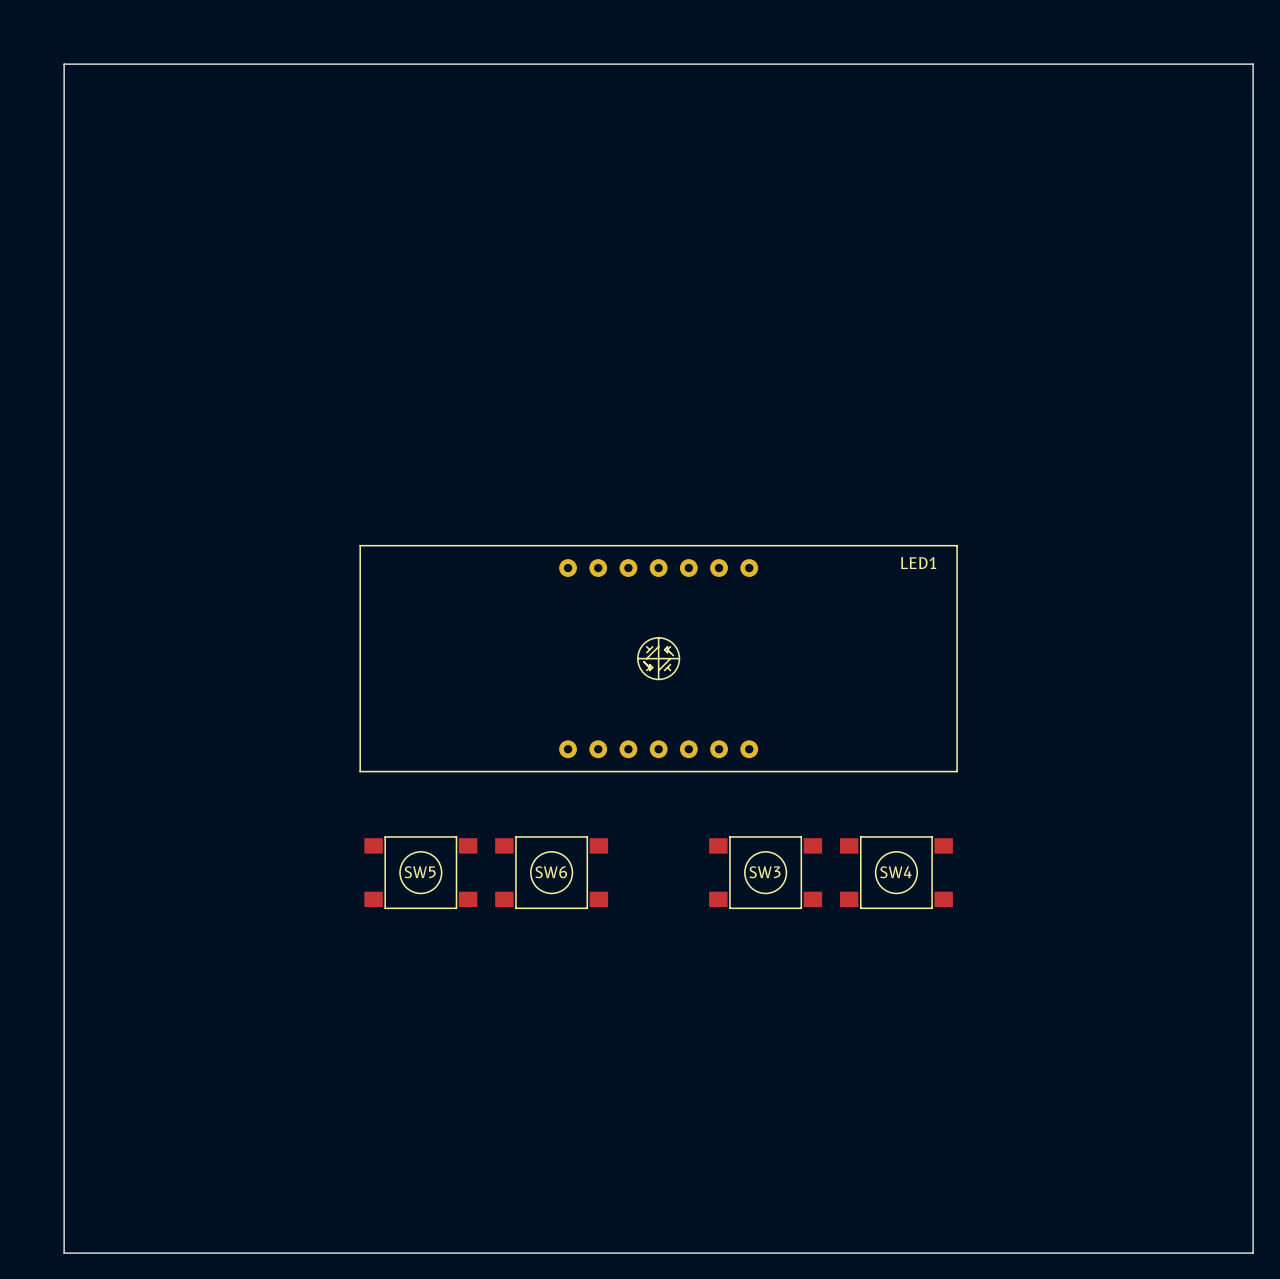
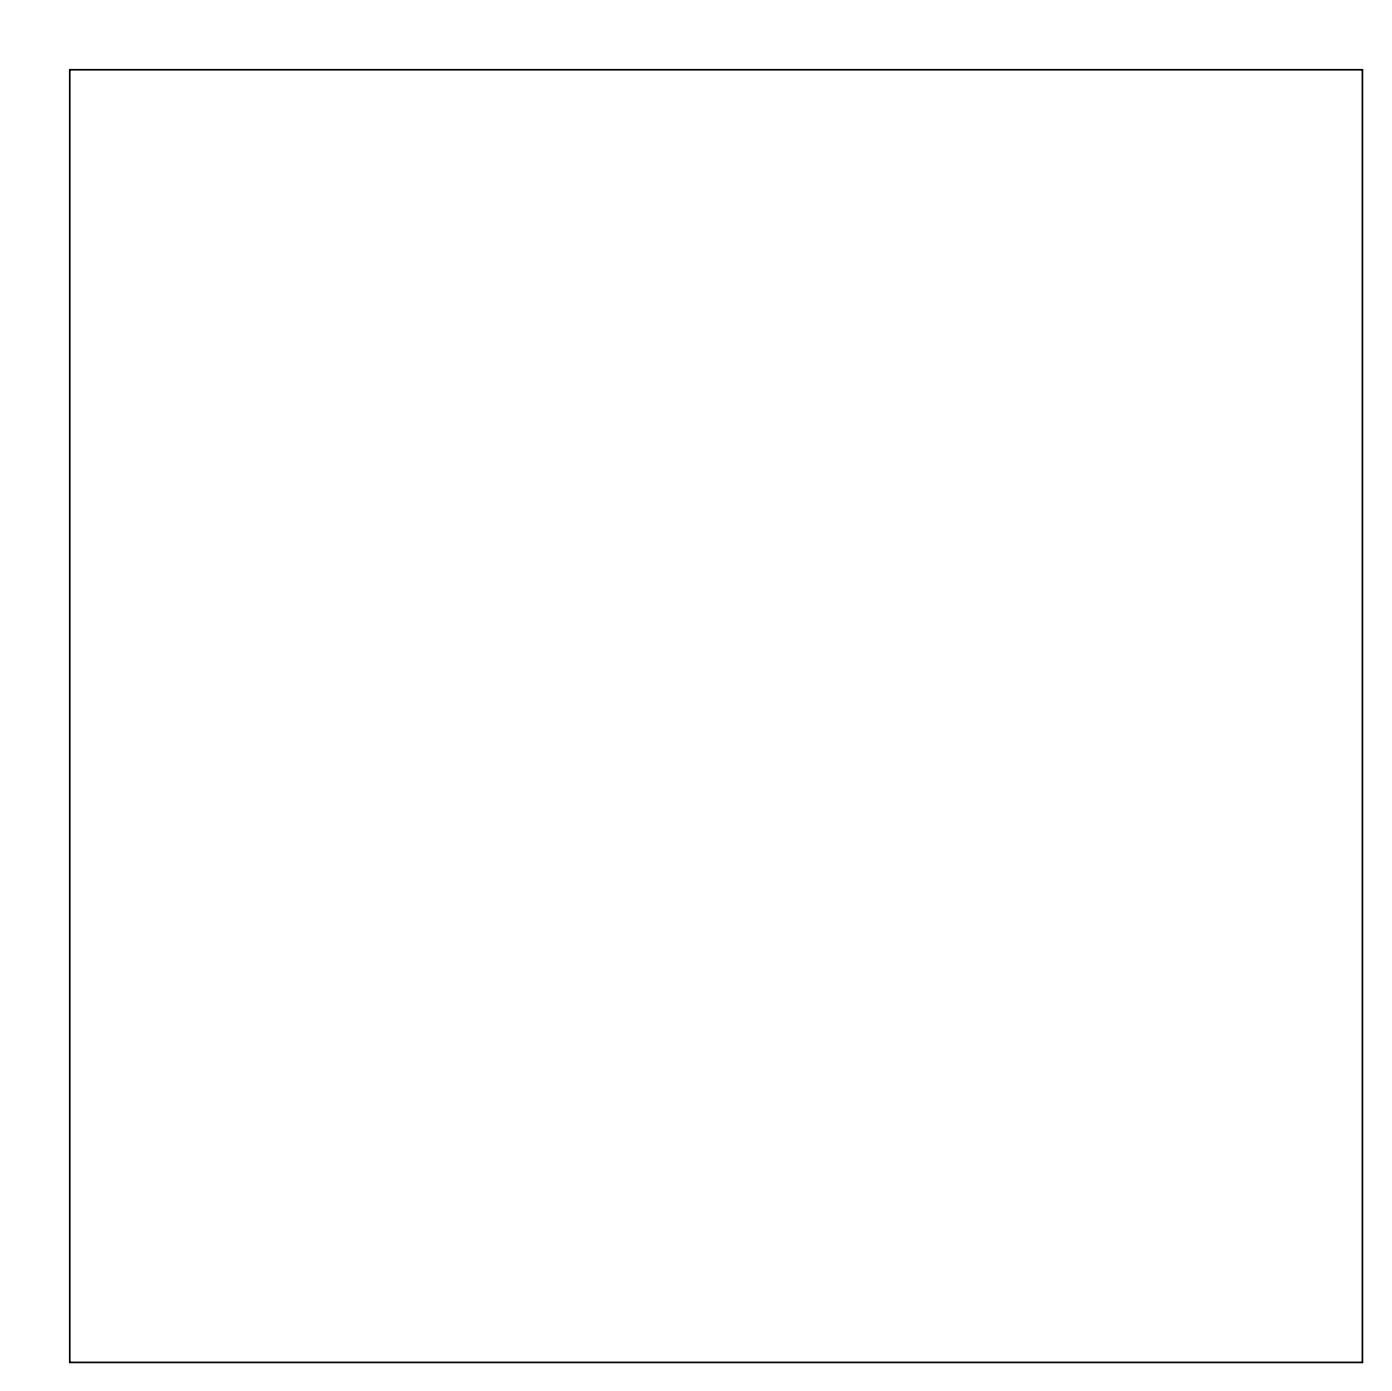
LED1: (658, 658) -> none
SW5: (420, 872) -> none
SW6: (551, 872) -> none
SW3: (765, 872) -> none
SW4: (896, 872) -> none

